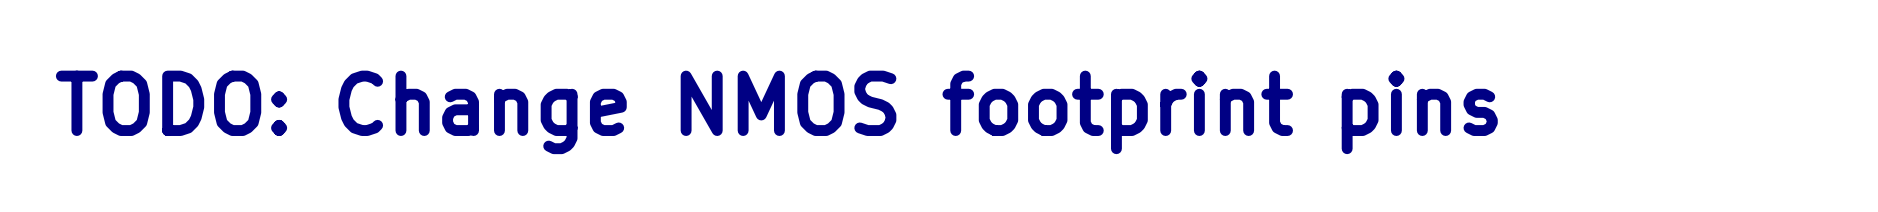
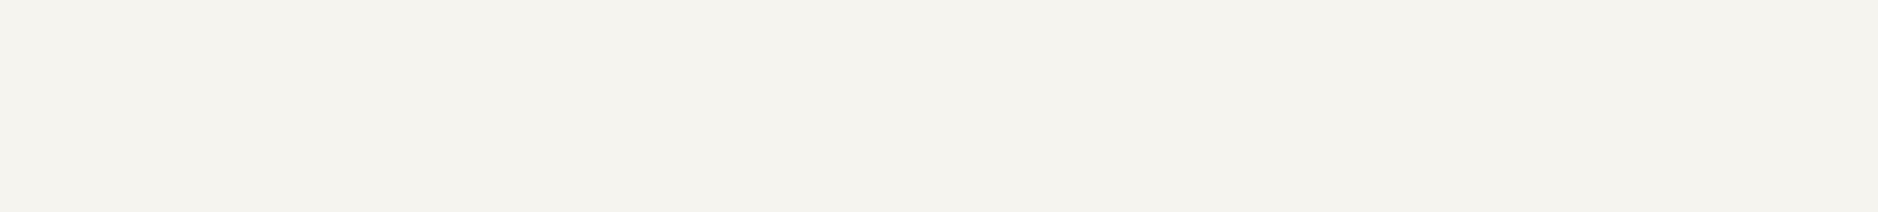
text: TODO: Change NMOS footprint pins (776, 112) -> none

